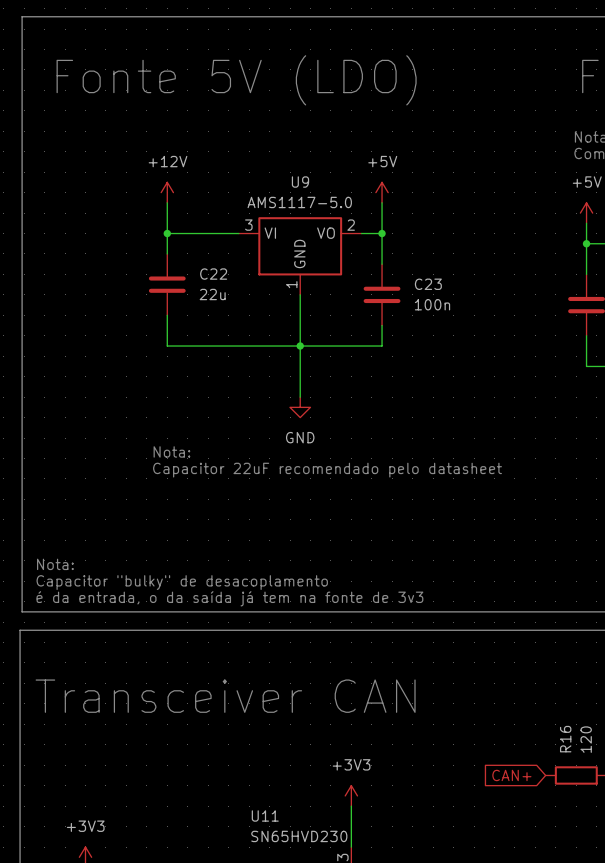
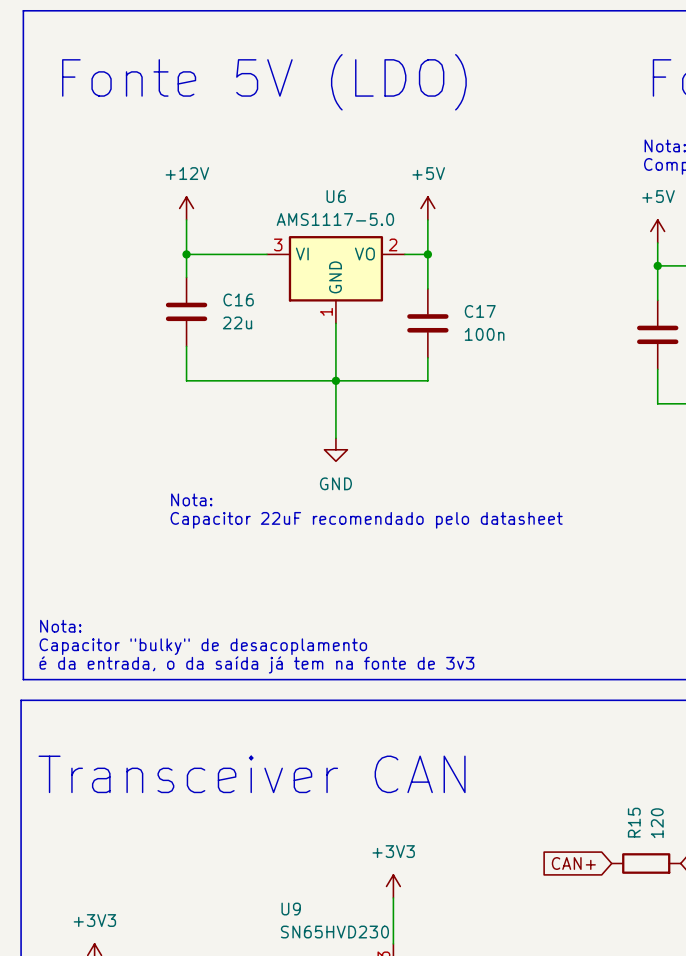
U9 name: U9 (300, 182) -> U6 (336, 196)
C22 name: C22 (213, 274) -> C16 (238, 299)
C23 name: C23 (428, 284) -> C17 (480, 311)
R16 name: R16 (565, 739) -> R15 (634, 822)
U11 name: U11 (265, 815) -> U9 (291, 909)

